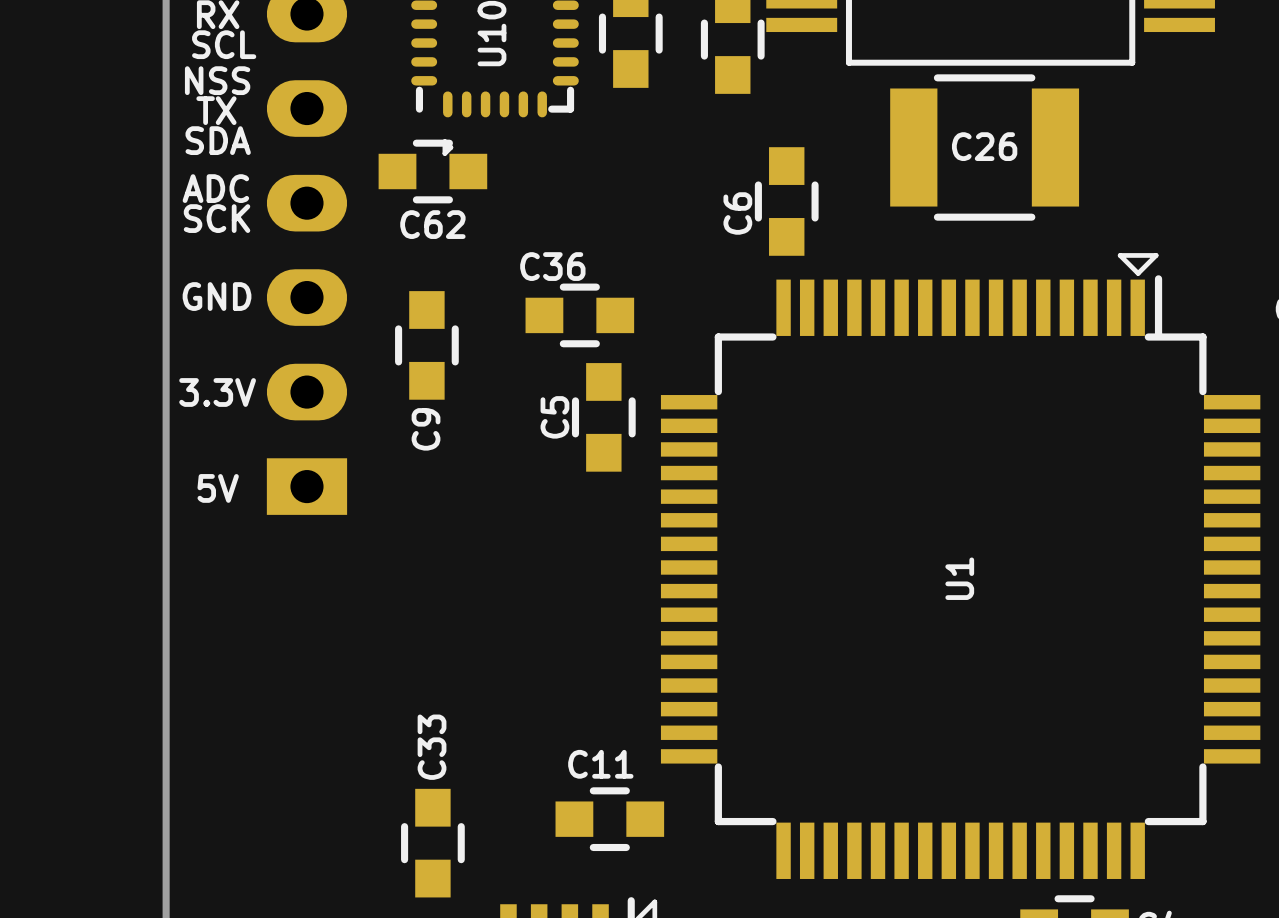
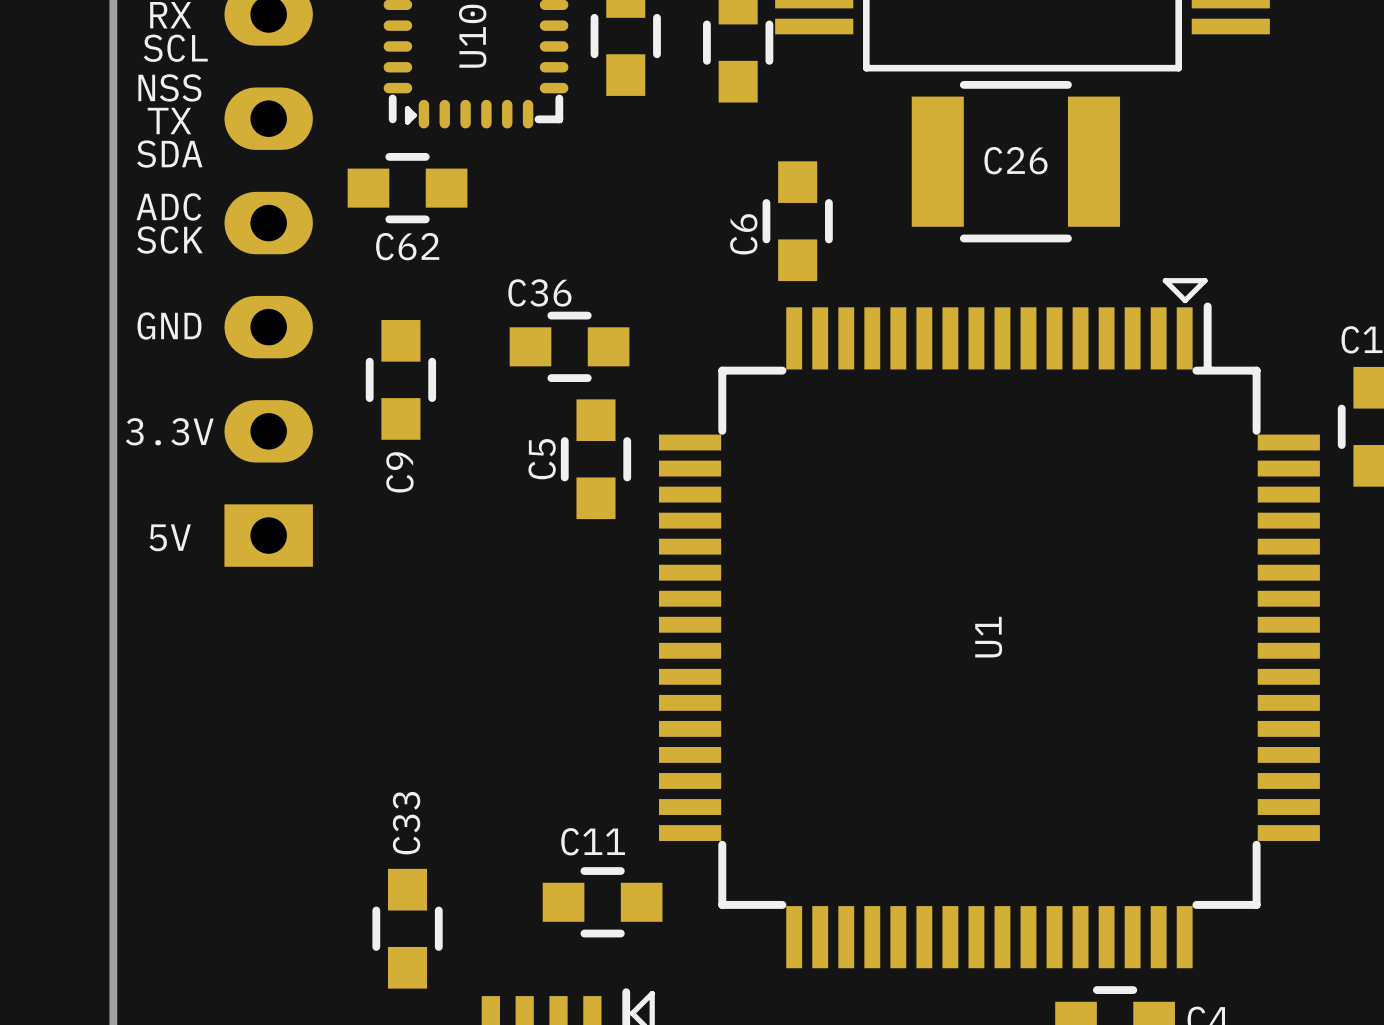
line: (444, 141) (444, 153) (450, 147) (444, 141) -> (407, 108) (407, 122) (414, 115) (407, 108)

